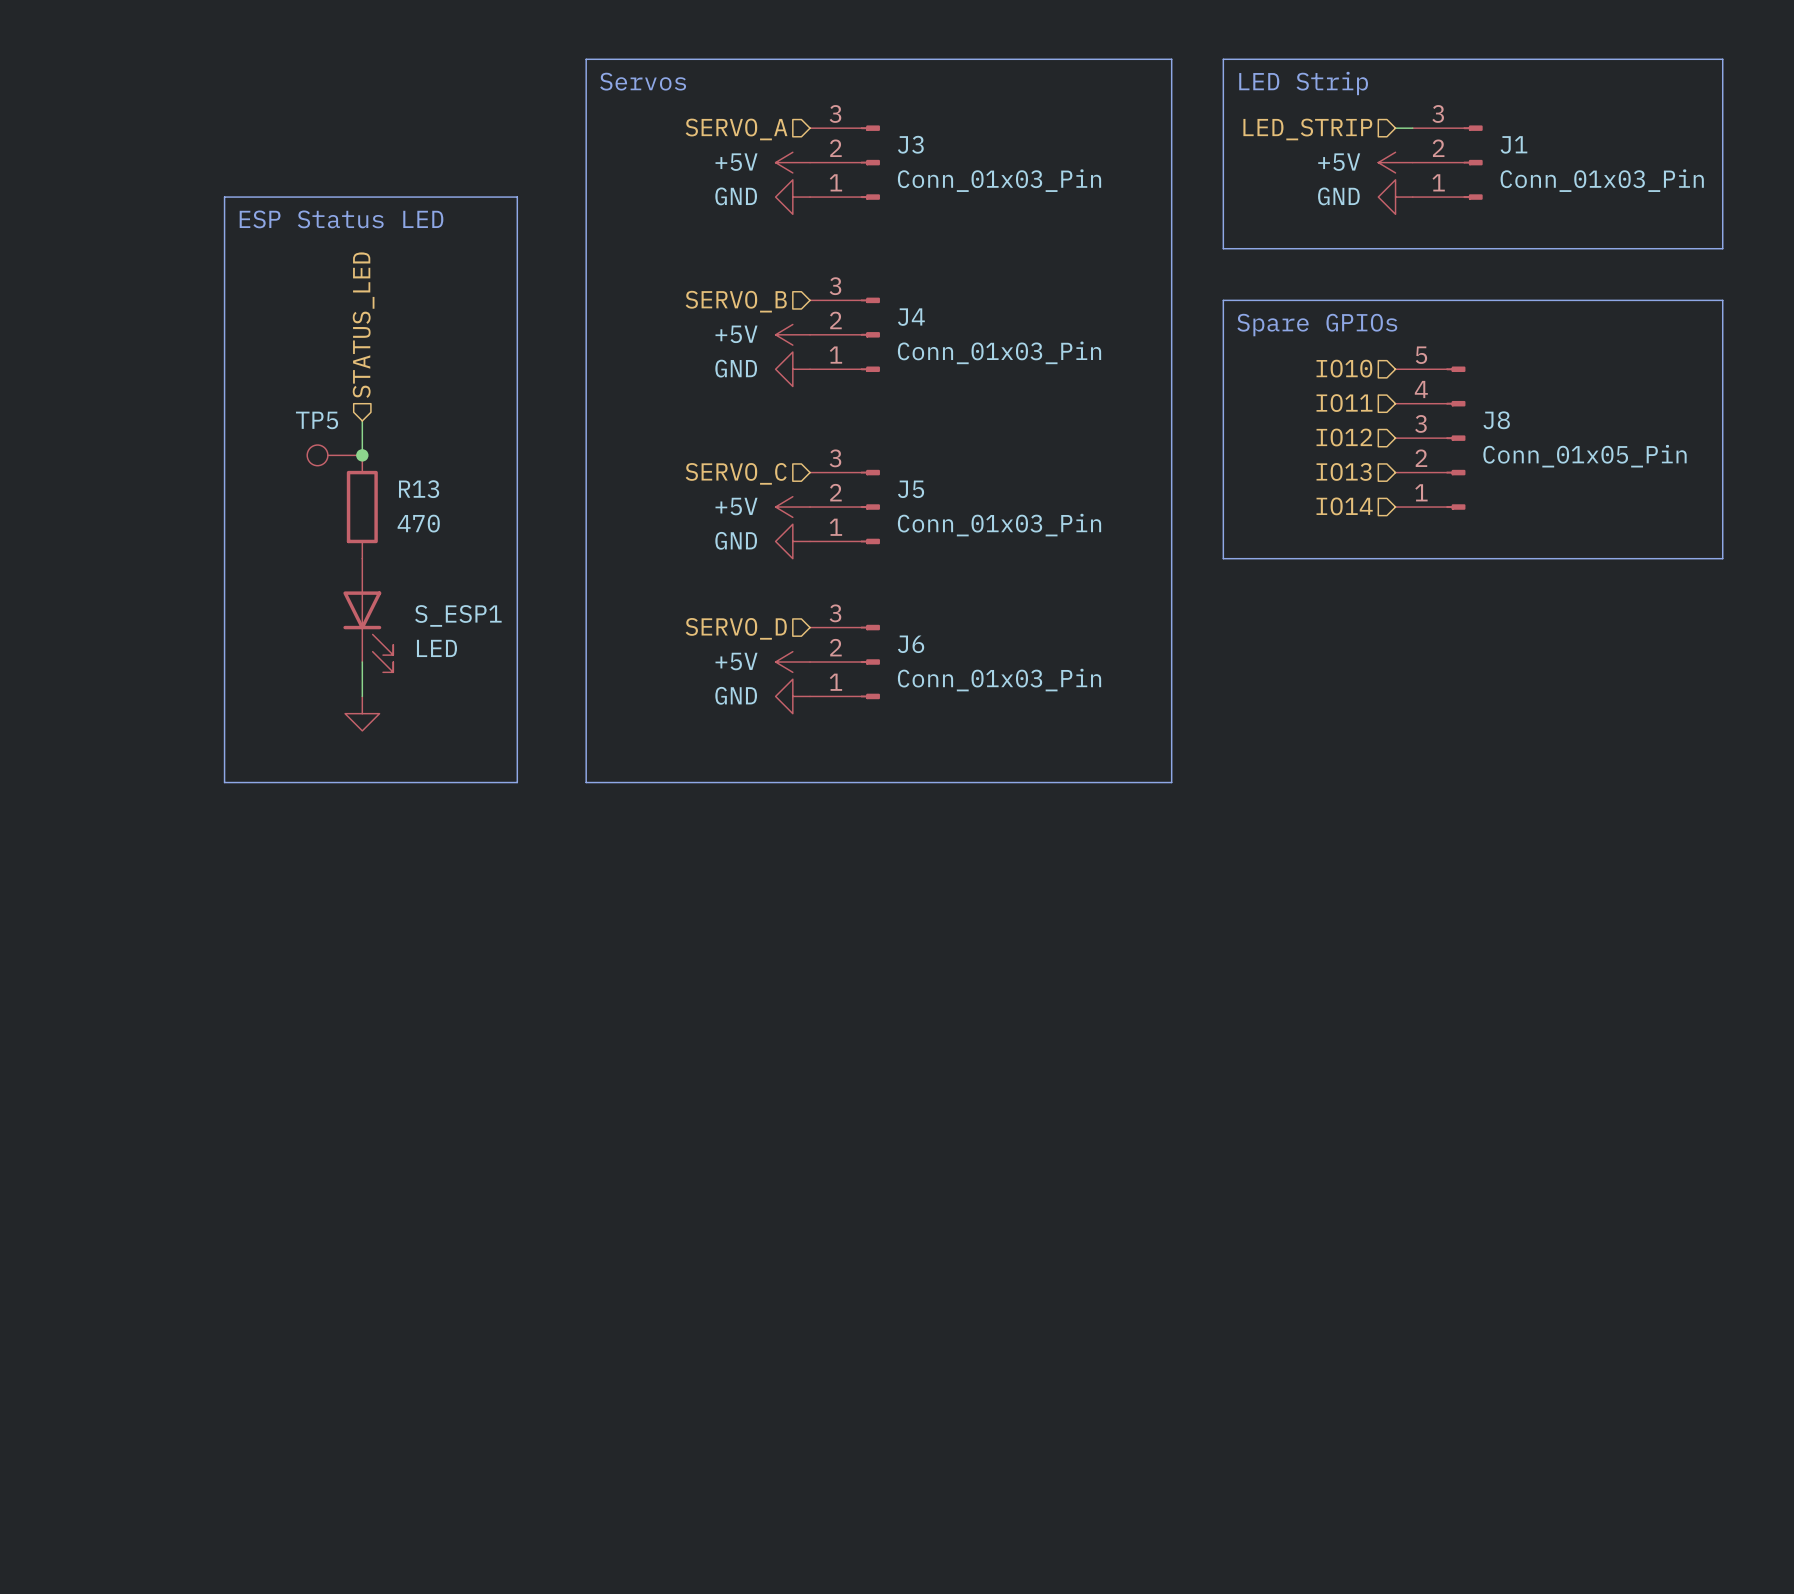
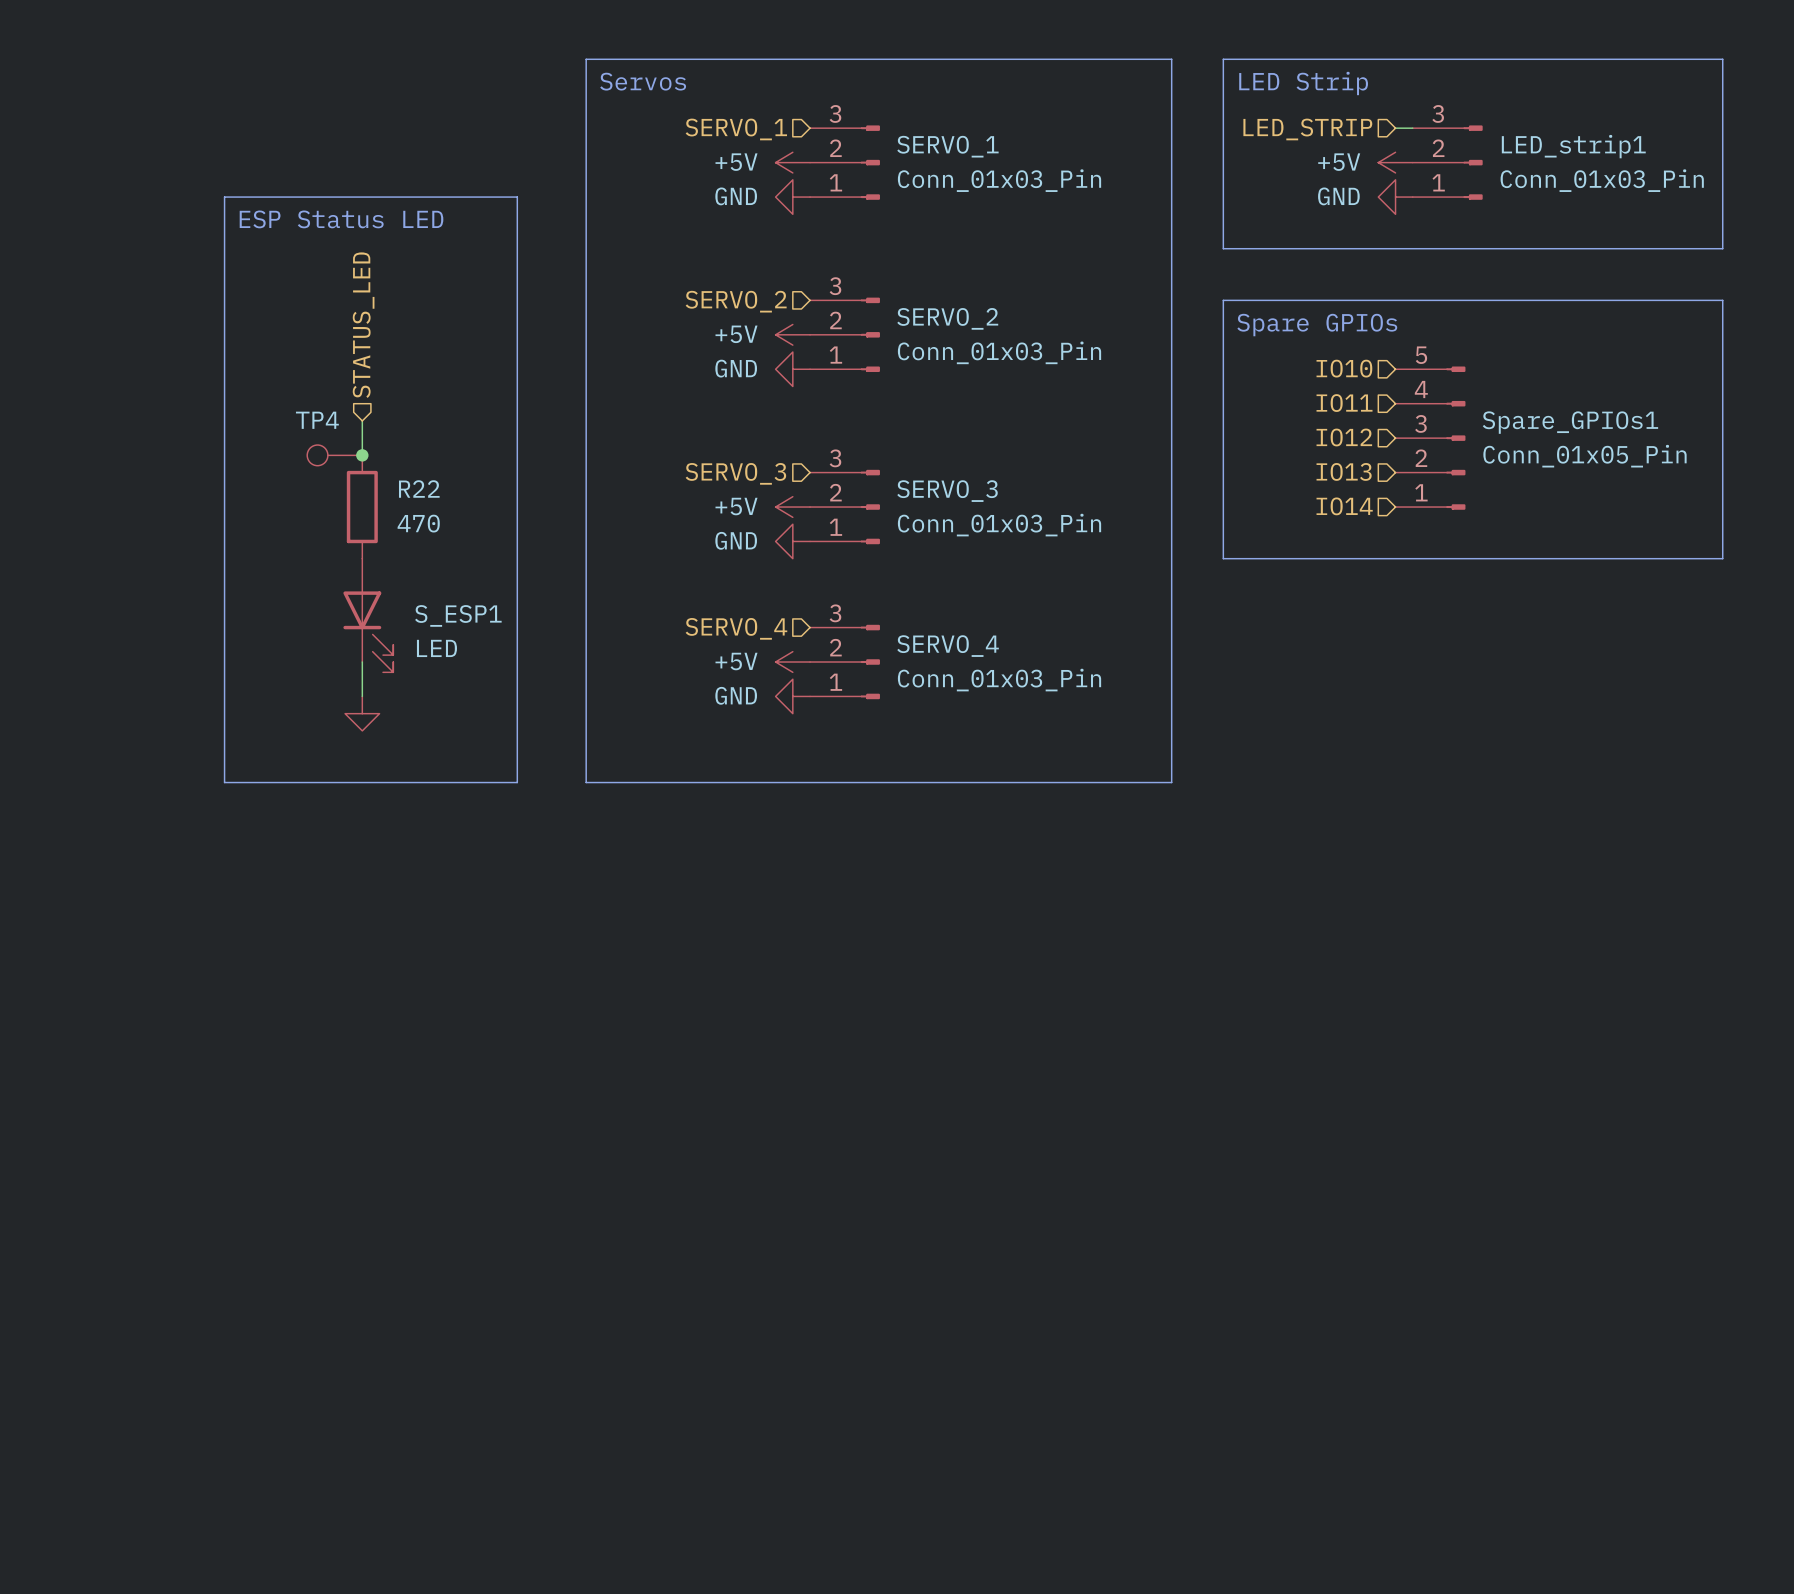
hierarchical label: SERVO_A (736, 129) -> SERVO_1 (736, 129)
J3 name: J3 (910, 144) -> SERVO_1 (947, 146)
J1 name: J1 (1514, 144) -> LED_strip1 (1573, 146)
hierarchical label: SERVO_B (736, 301) -> SERVO_2 (736, 301)
J4 name: J4 (911, 317) -> SERVO_2 (947, 318)
TP5 name: TP5 (317, 420) -> TP4 (317, 420)
J8 name: J8 (1496, 420) -> Spare_GPIOs1 (1570, 422)
hierarchical label: SERVO_C (736, 473) -> SERVO_3 (735, 473)
R13 name: R13 (419, 489) -> R22 (419, 489)
J5 name: J5 (911, 489) -> SERVO_3 (947, 491)
hierarchical label: SERVO_D (736, 628) -> SERVO_4 (736, 628)
J6 name: J6 (911, 644) -> SERVO_4 (948, 646)

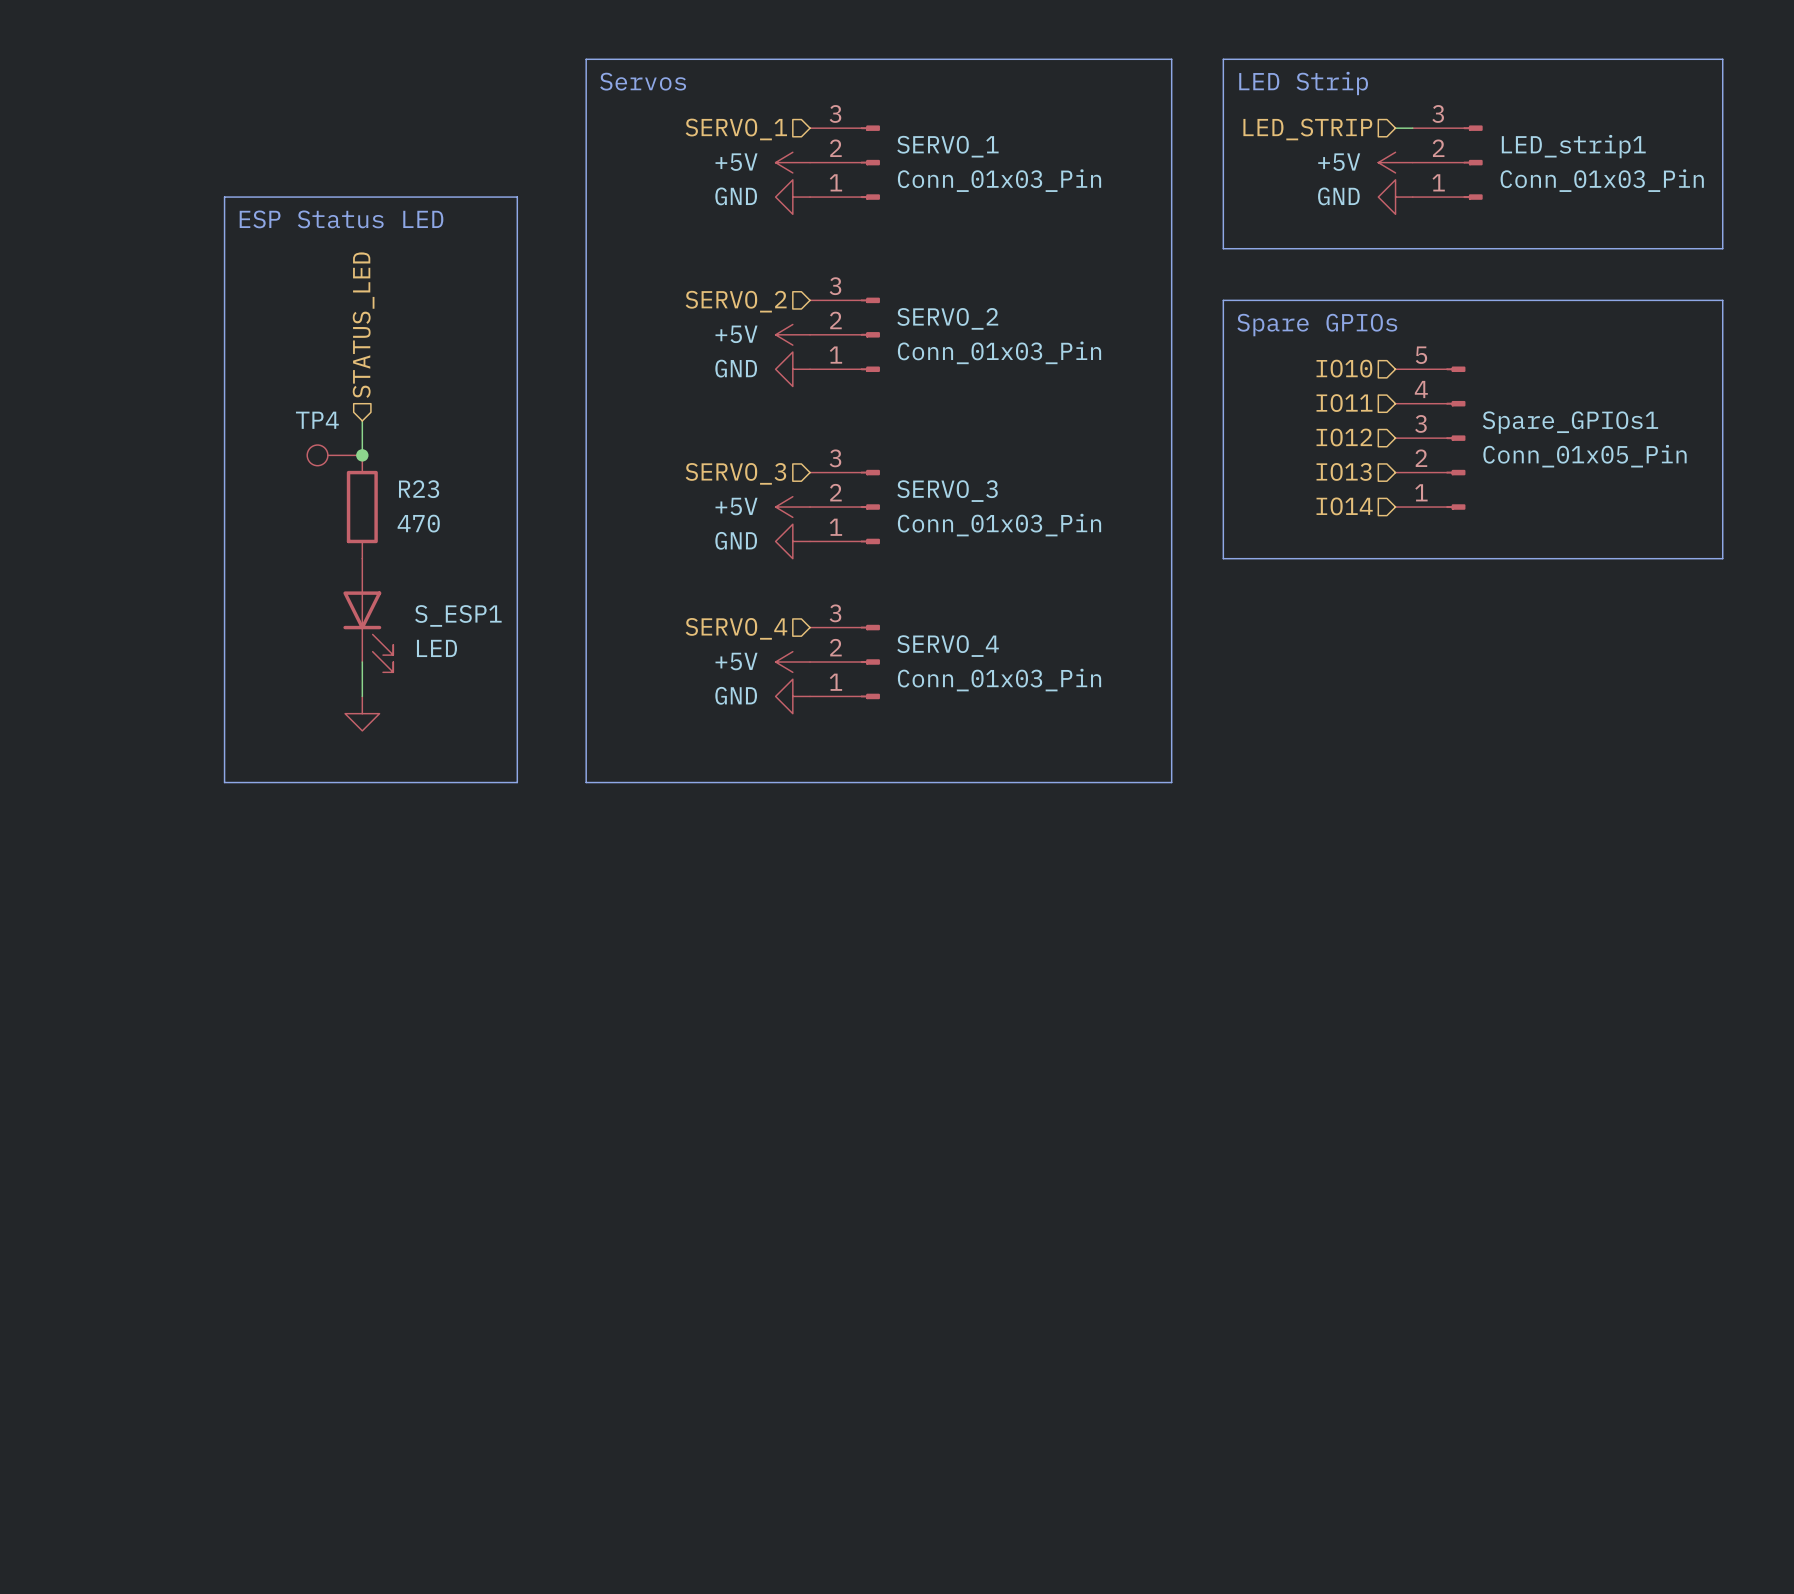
R22 name: R22 (419, 489) -> R23 (419, 489)

